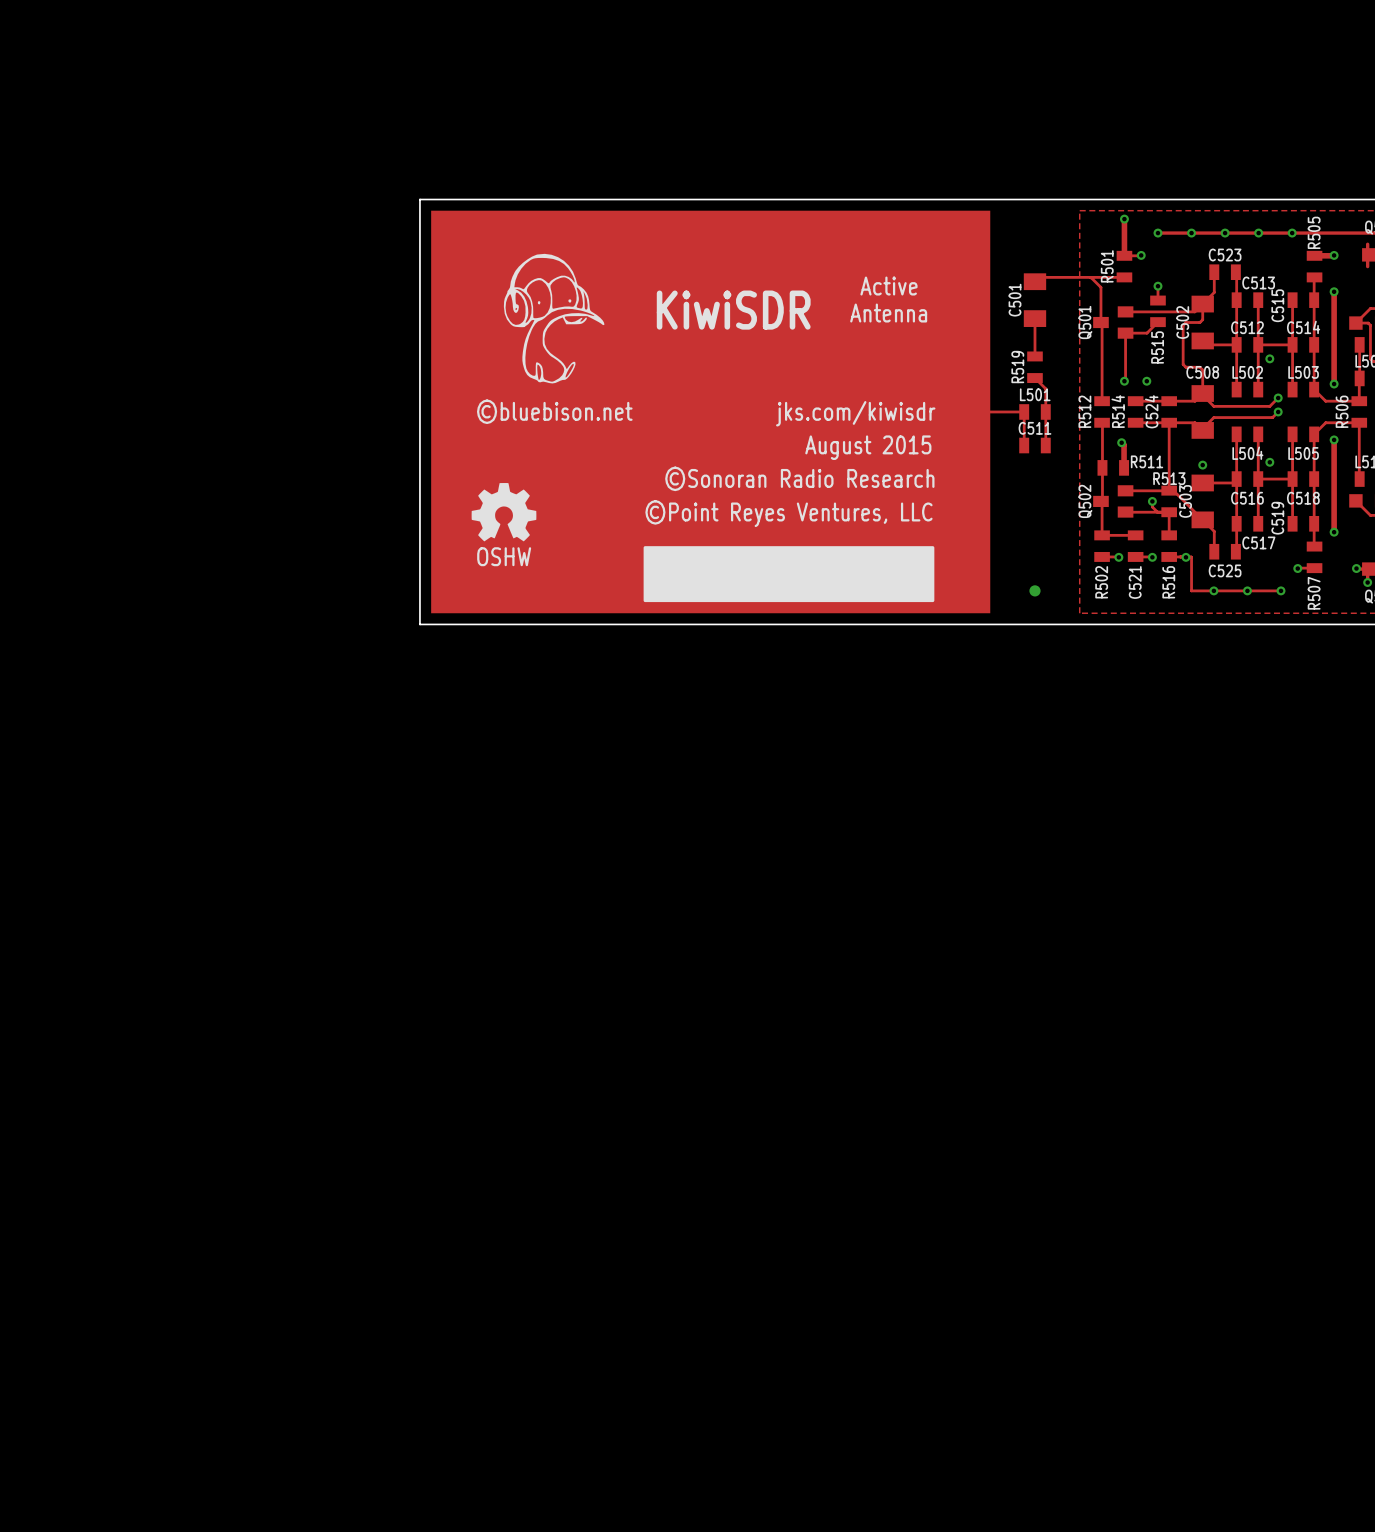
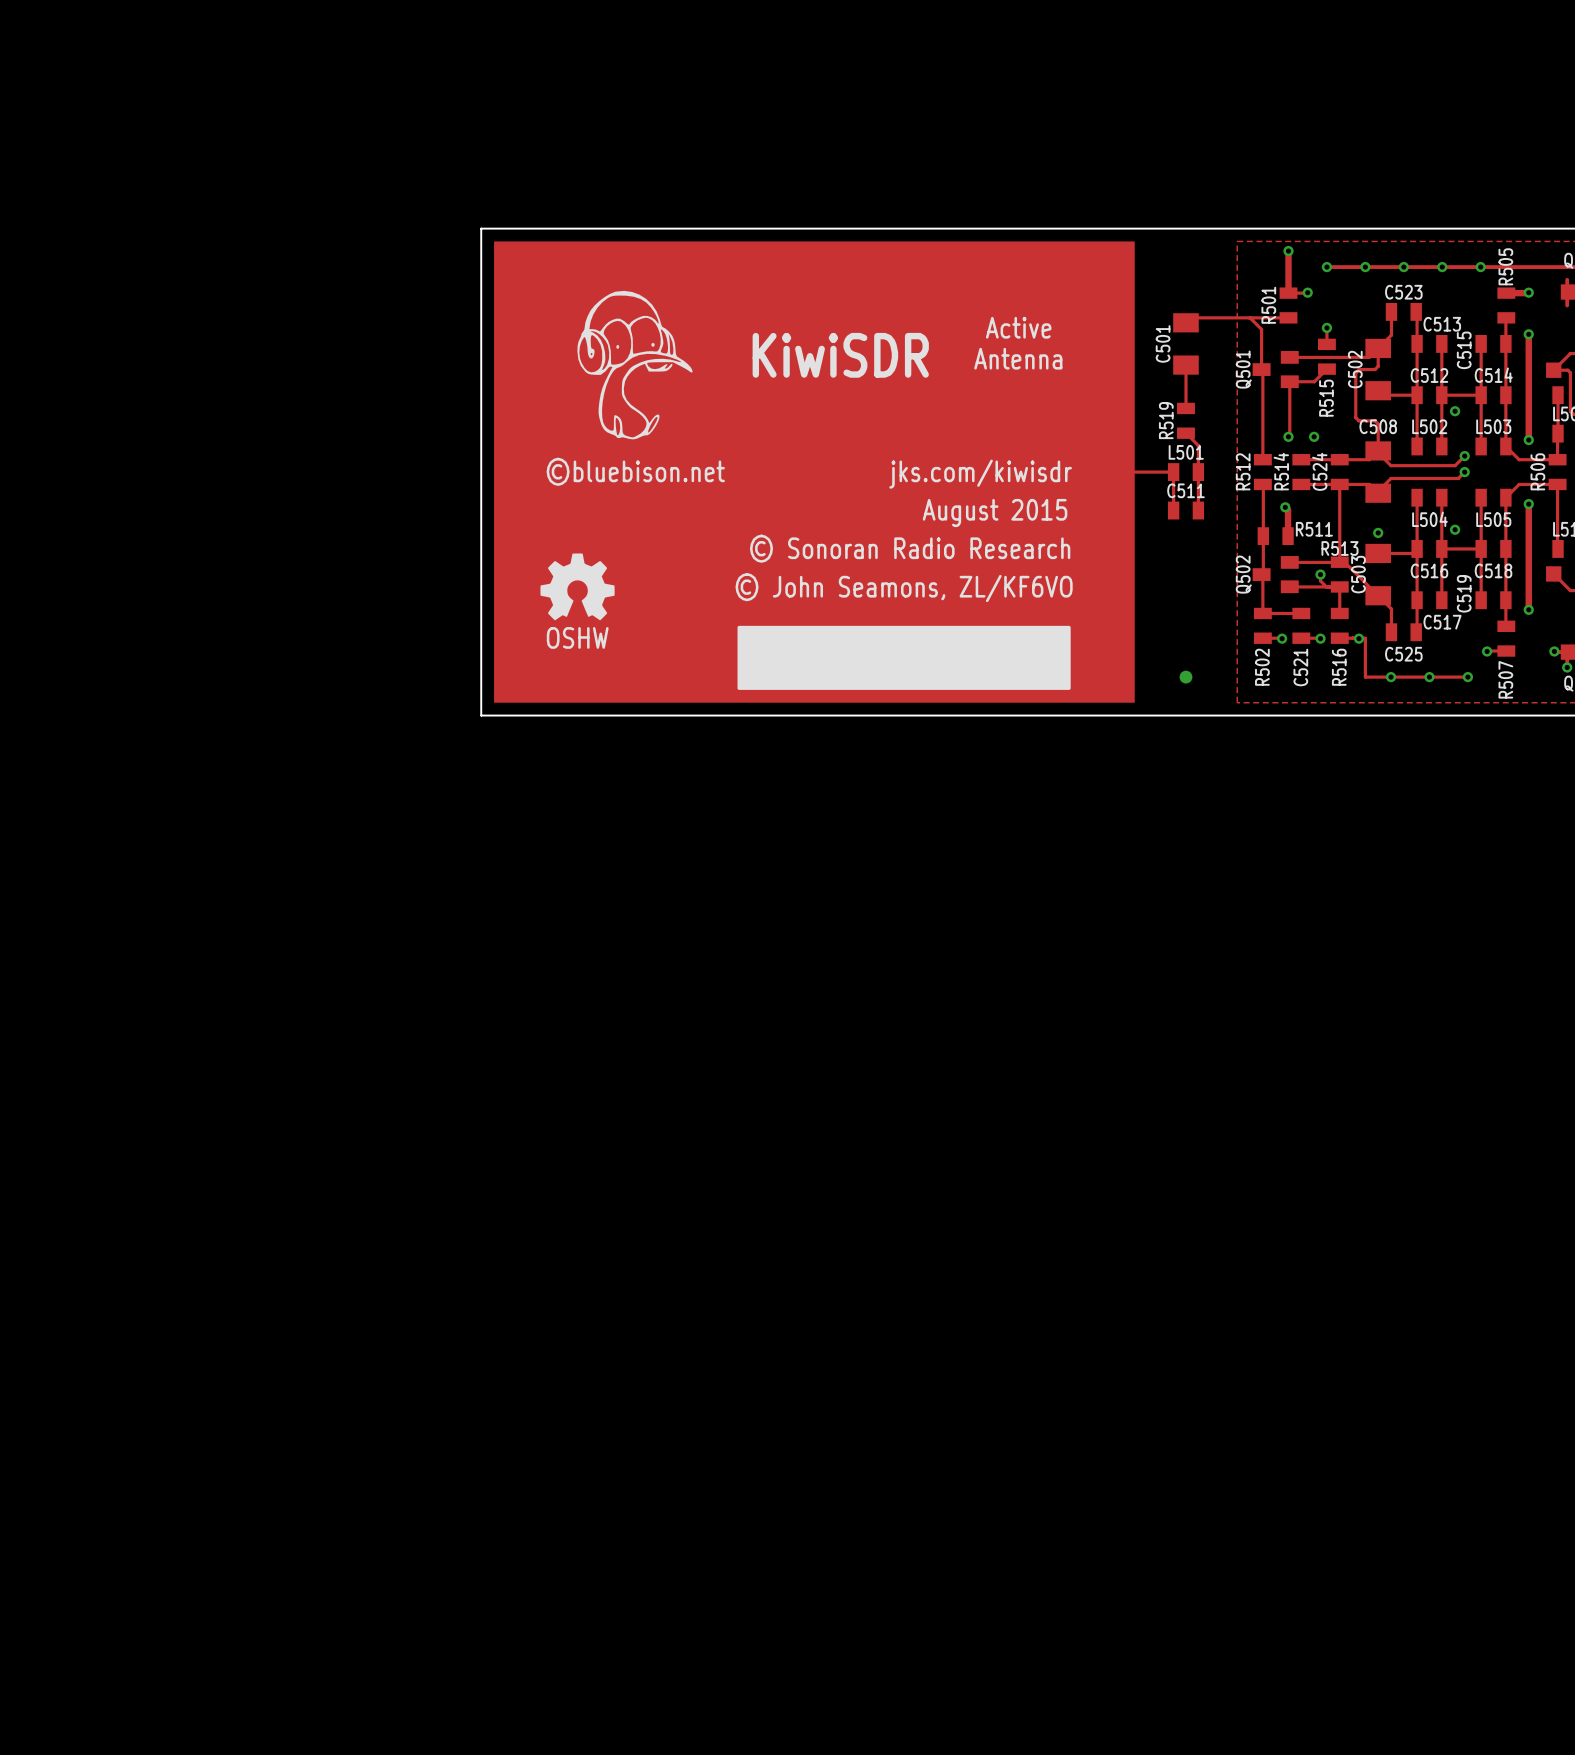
text: ©Sonoran Radio Research (799, 478) -> © Sonoran Radio Research (910, 548)
text: ©Point Reyes Ventures, LLC (788, 513) -> © John Seamons, ZL/KF6VO (904, 587)

